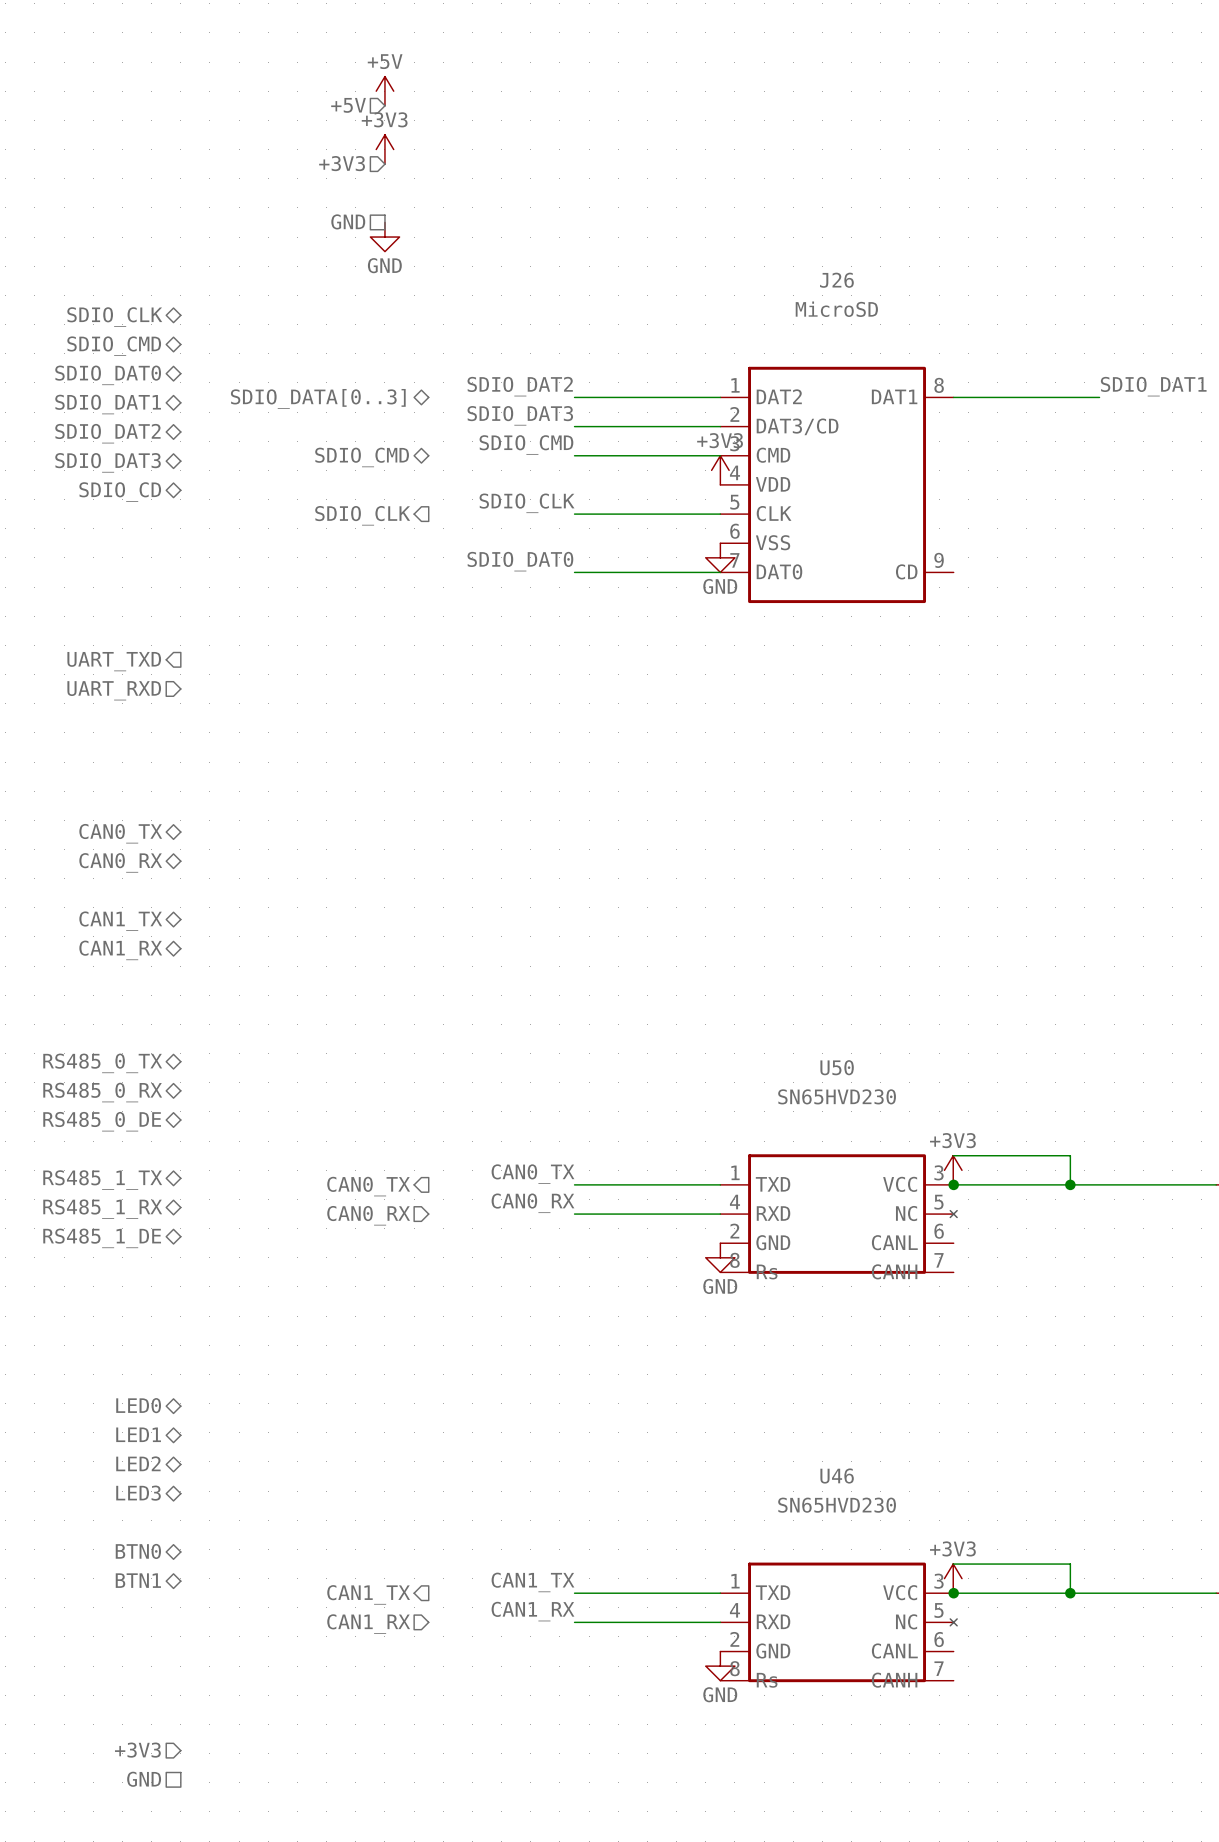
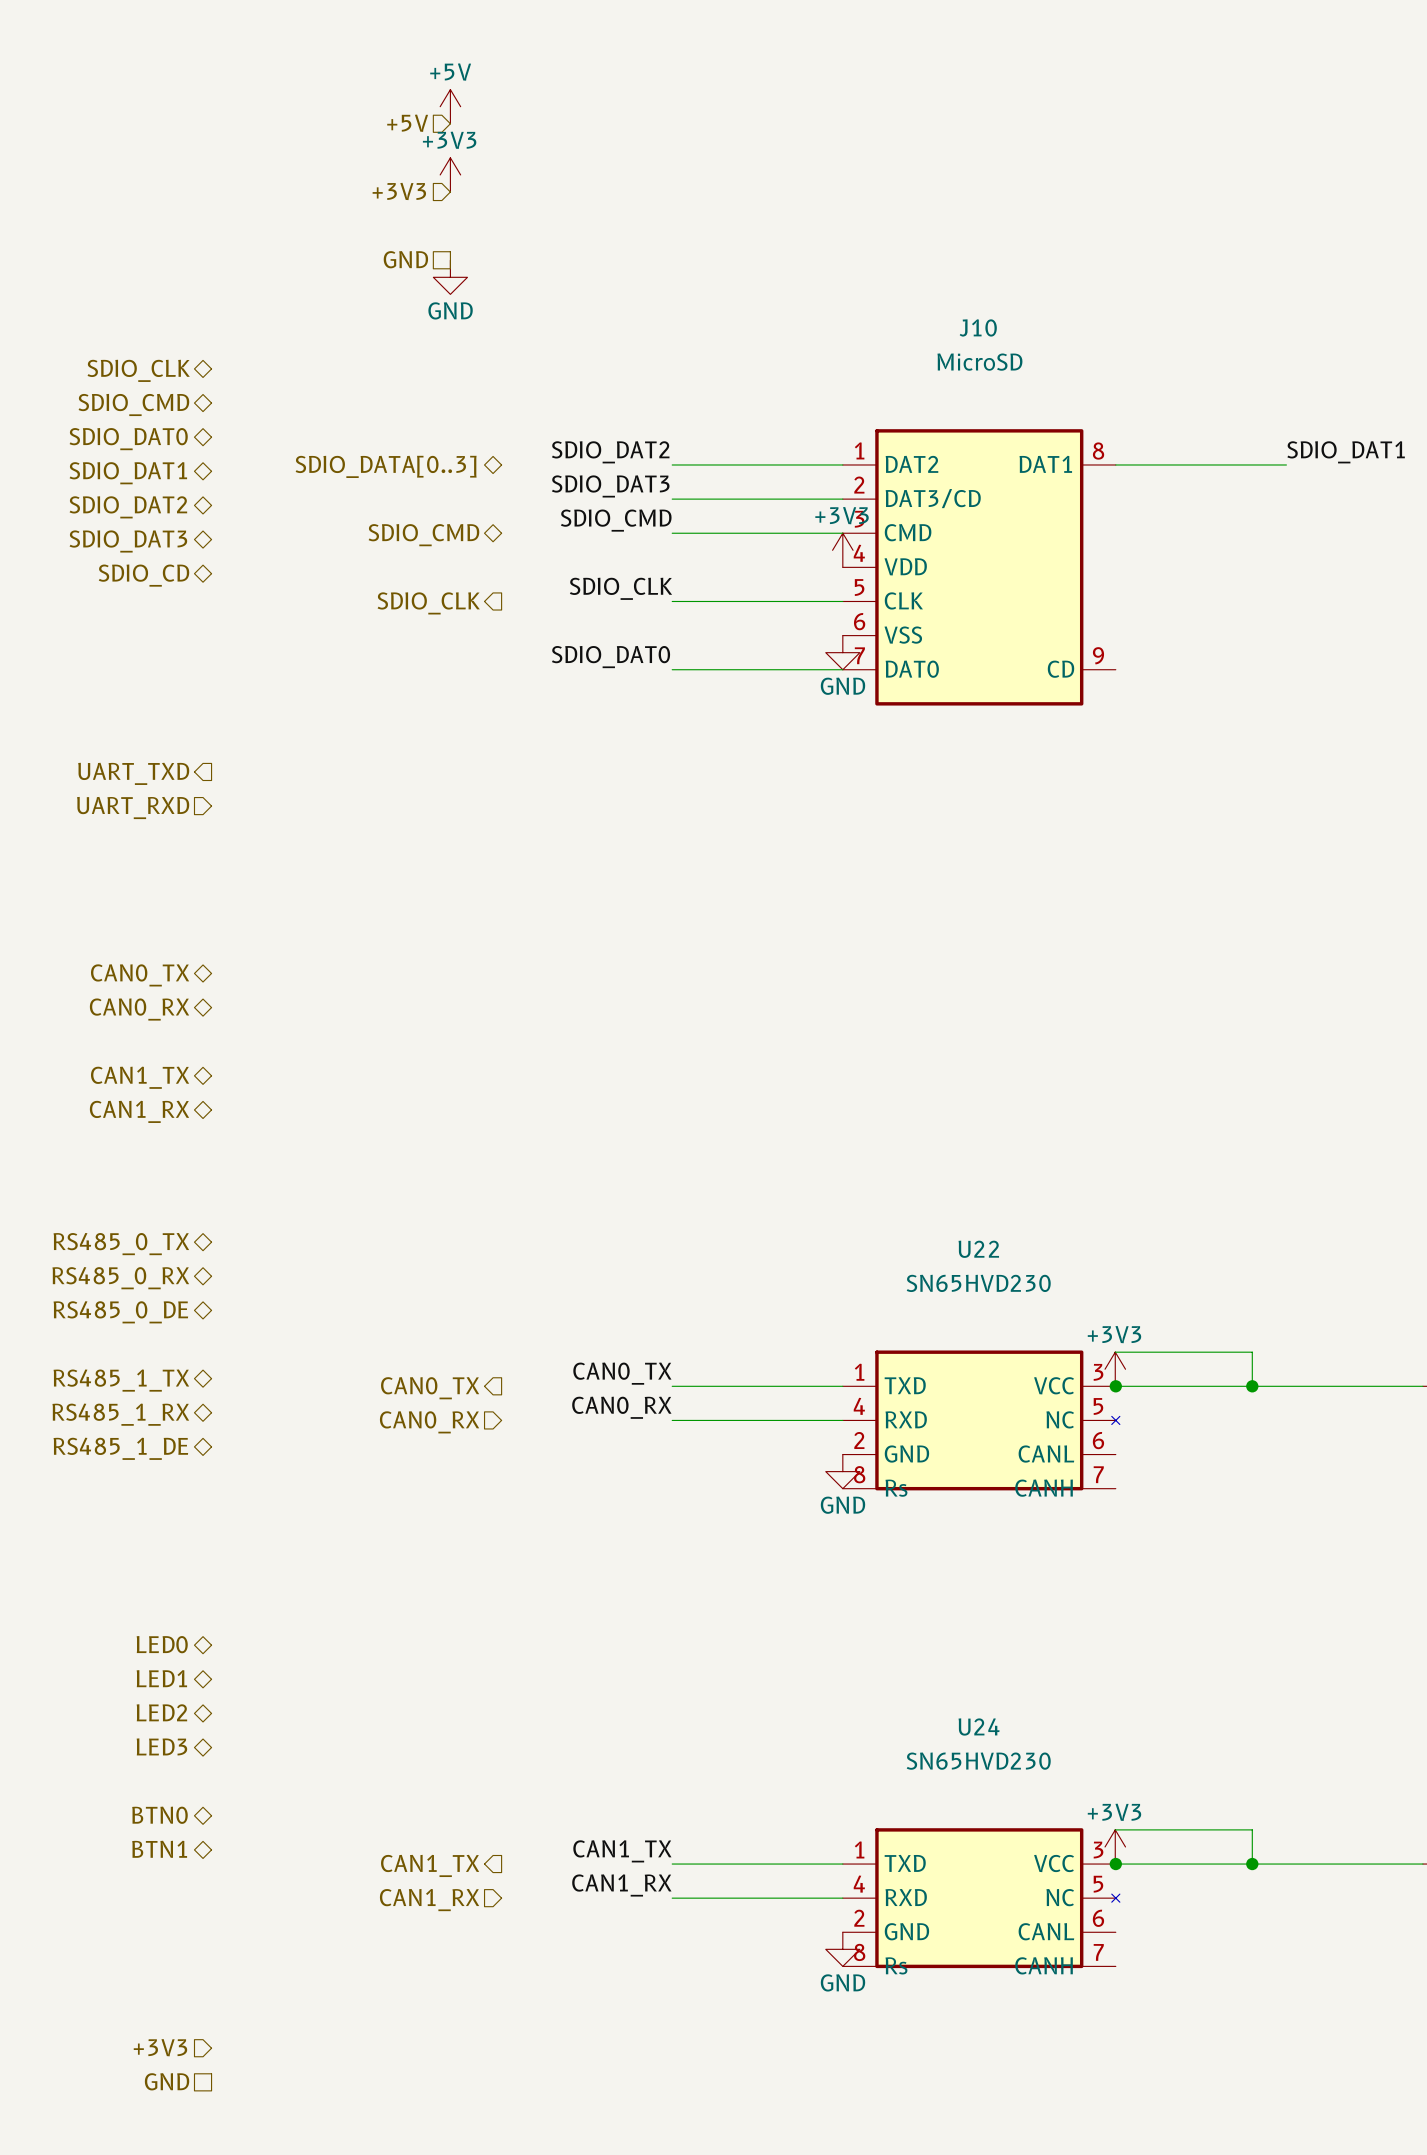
J26 name: J26 (836, 280) -> J10 (978, 327)
U50 name: U50 (837, 1067) -> U22 (978, 1249)
U46 name: U46 (837, 1476) -> U24 (979, 1726)

